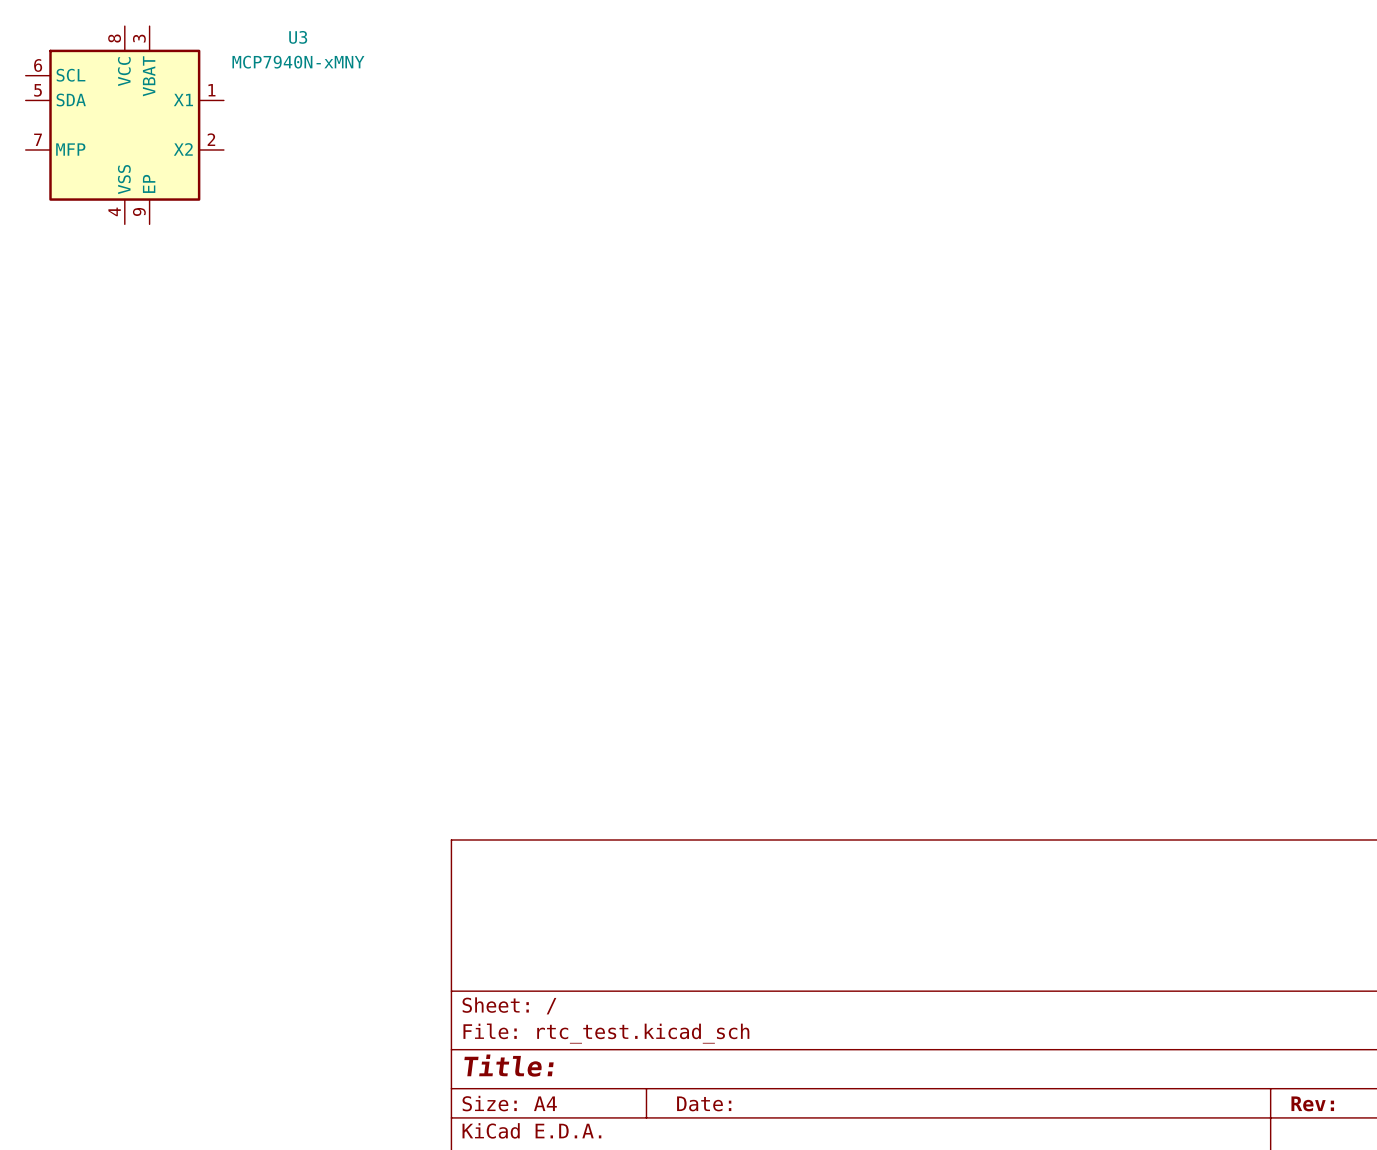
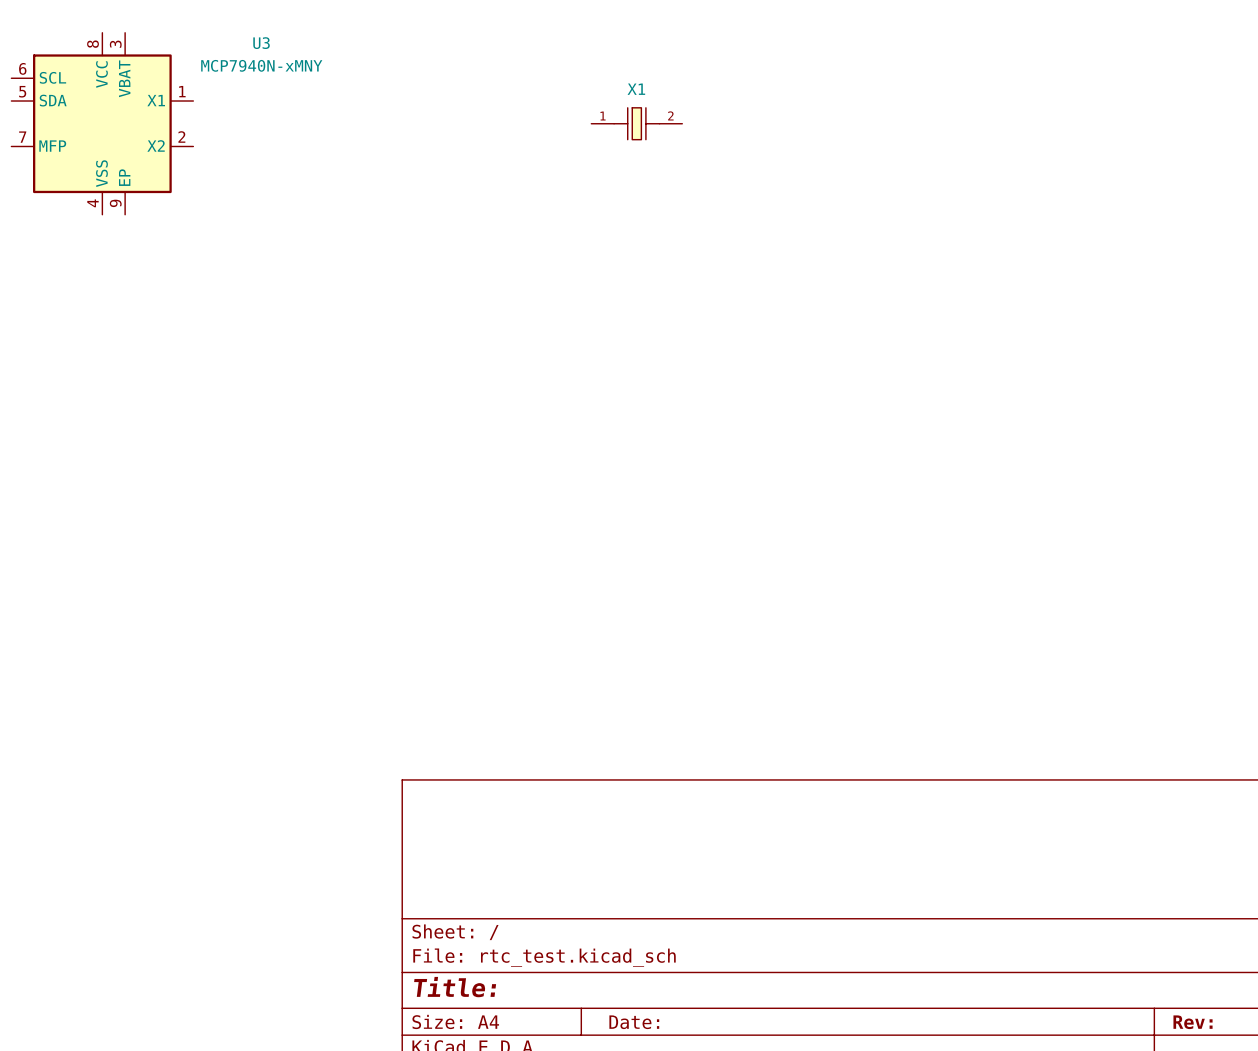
X1: none -> (636, 123)

